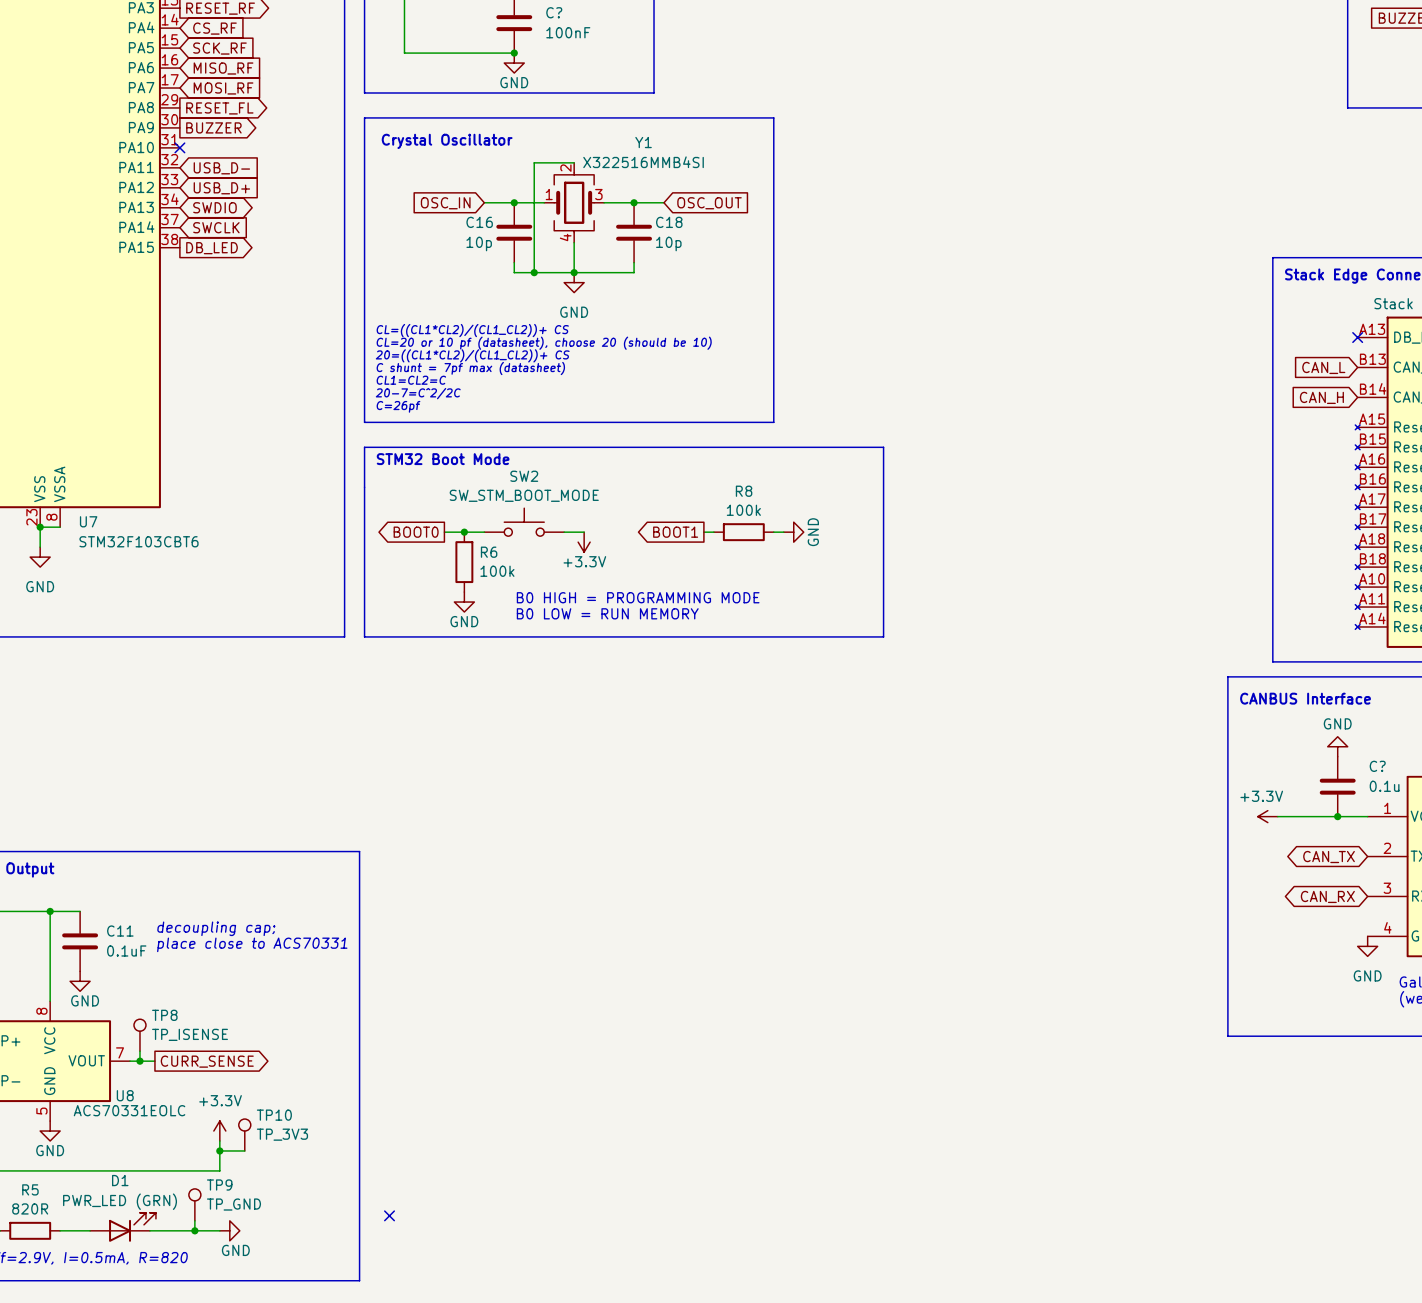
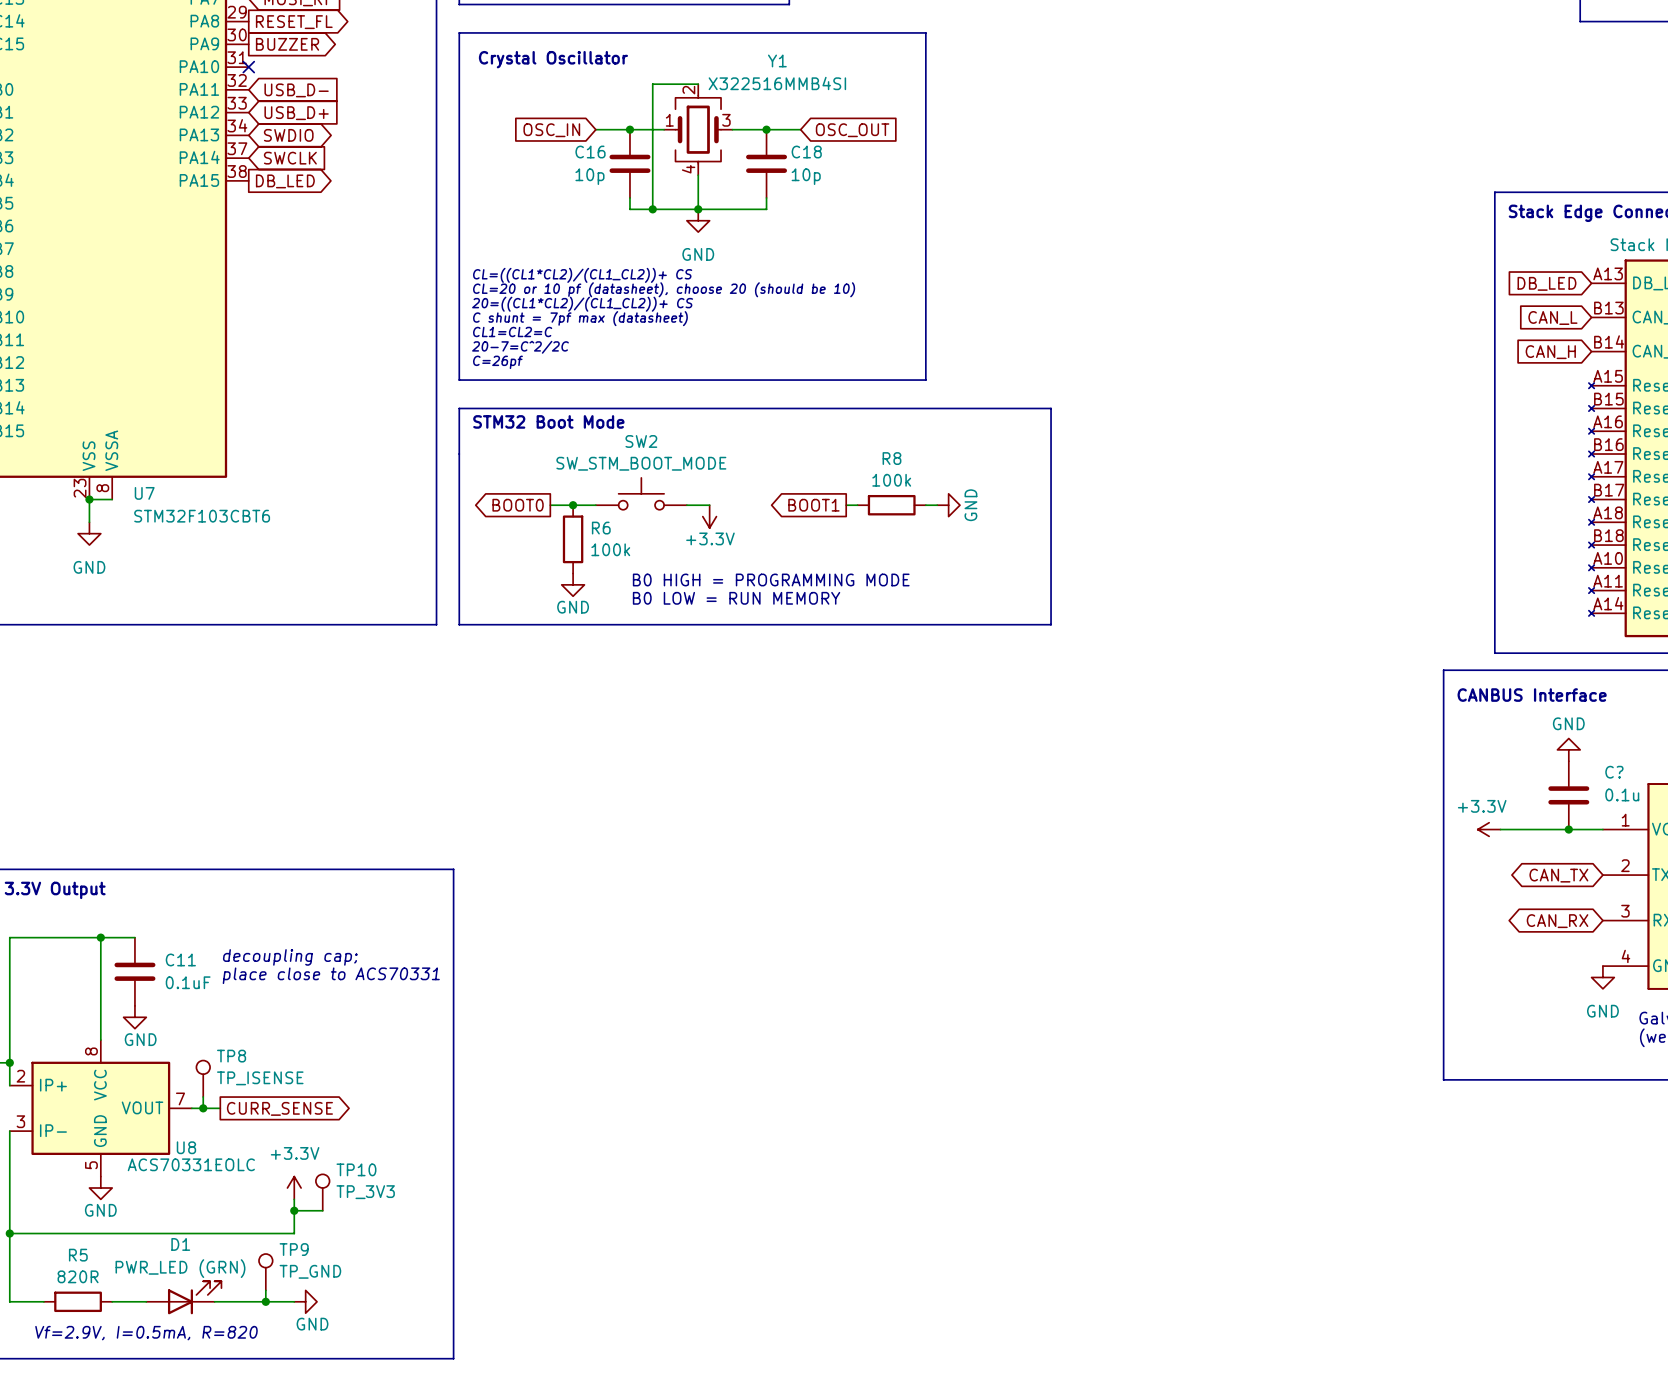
no-connect mark: (1357, 337) -> none
global label: none -> DB_LED (1546, 283)
no-connect mark: (389, 1215) -> none

